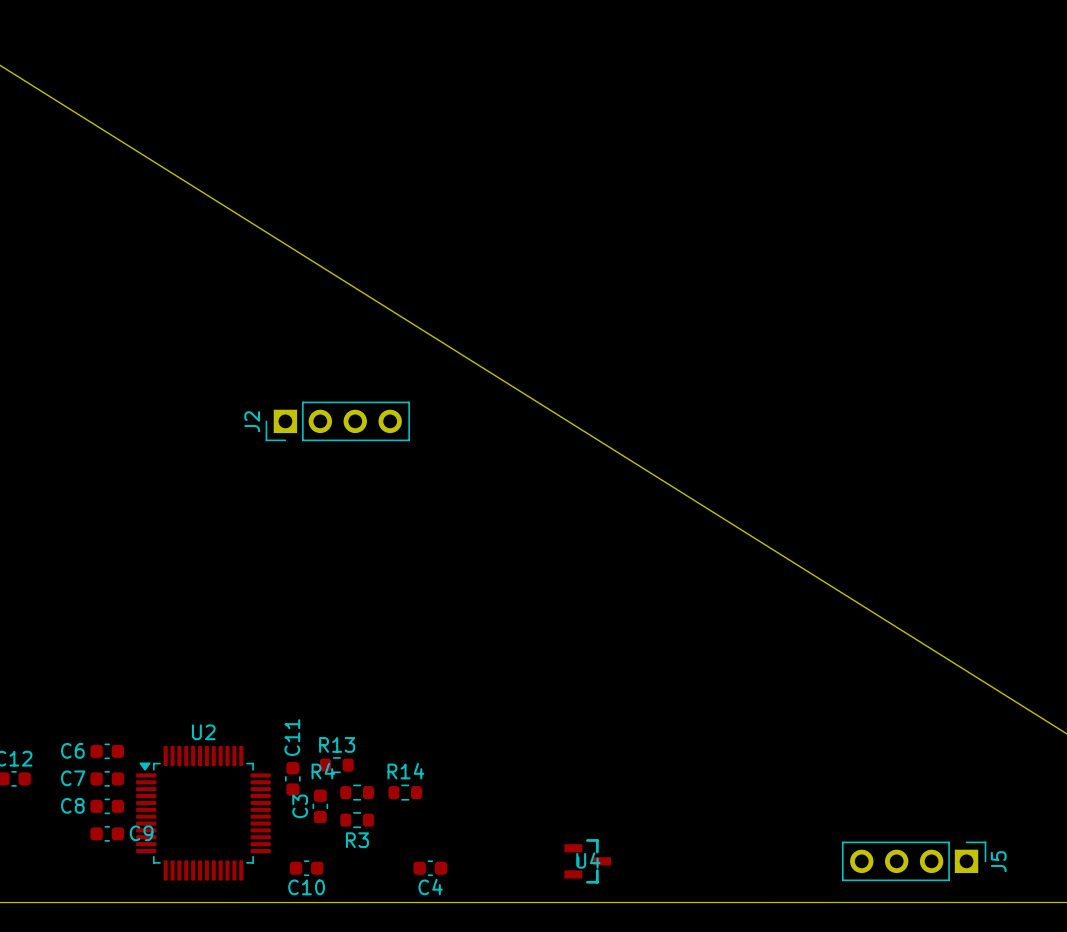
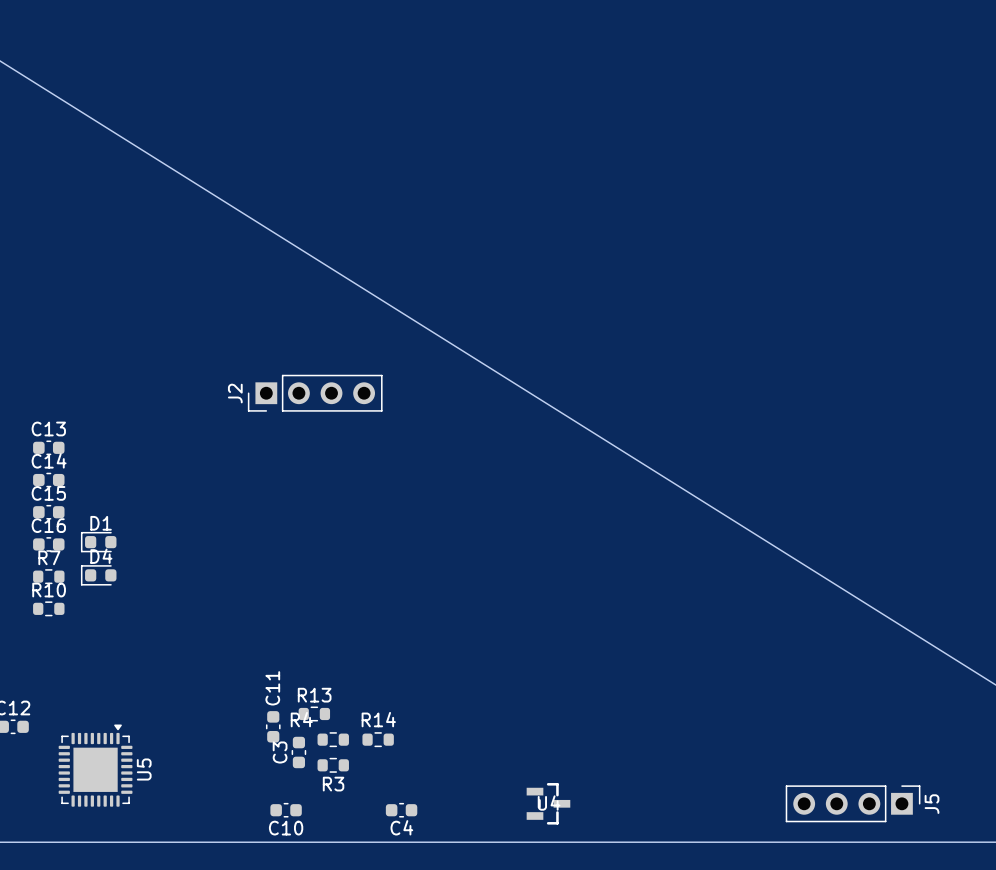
C13: none -> (48, 447)
C14: none -> (48, 480)
C15: none -> (48, 512)
D1: none -> (98, 542)
C16: none -> (48, 544)
D4: none -> (98, 575)
R7: none -> (48, 576)
R10: none -> (48, 608)
C6: (107, 751) -> none
C7: (107, 778) -> none
C8: (107, 806) -> none
U2: (203, 813) -> none
U5: none -> (95, 765)
C9: (107, 833) -> none

